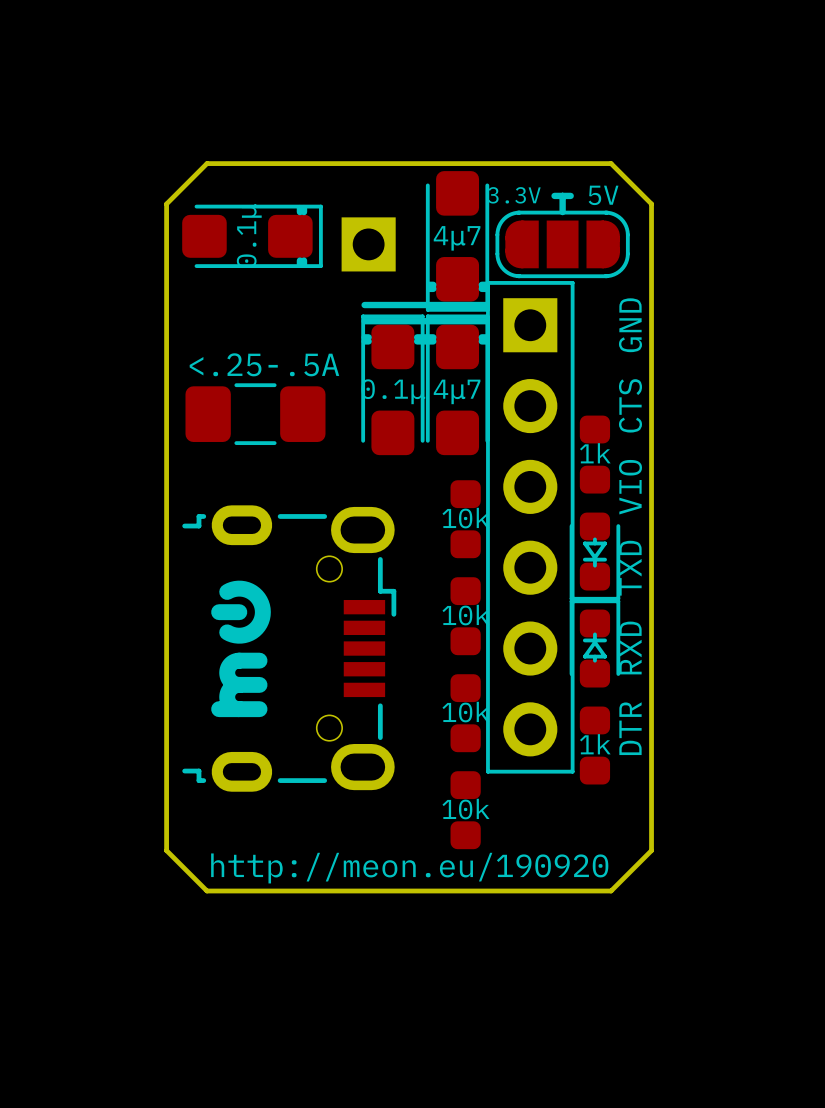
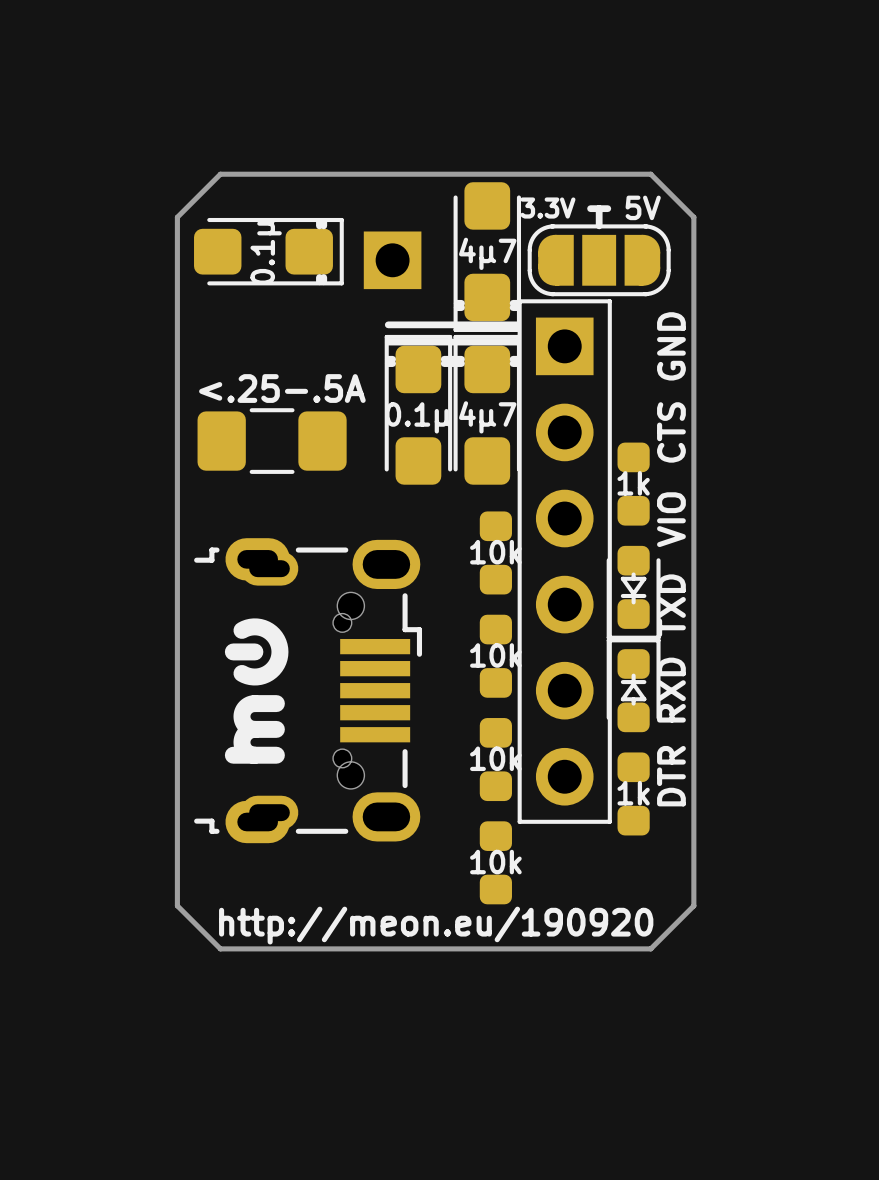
part footprint: [182, 505, 397, 792] -> [194, 538, 423, 844]

